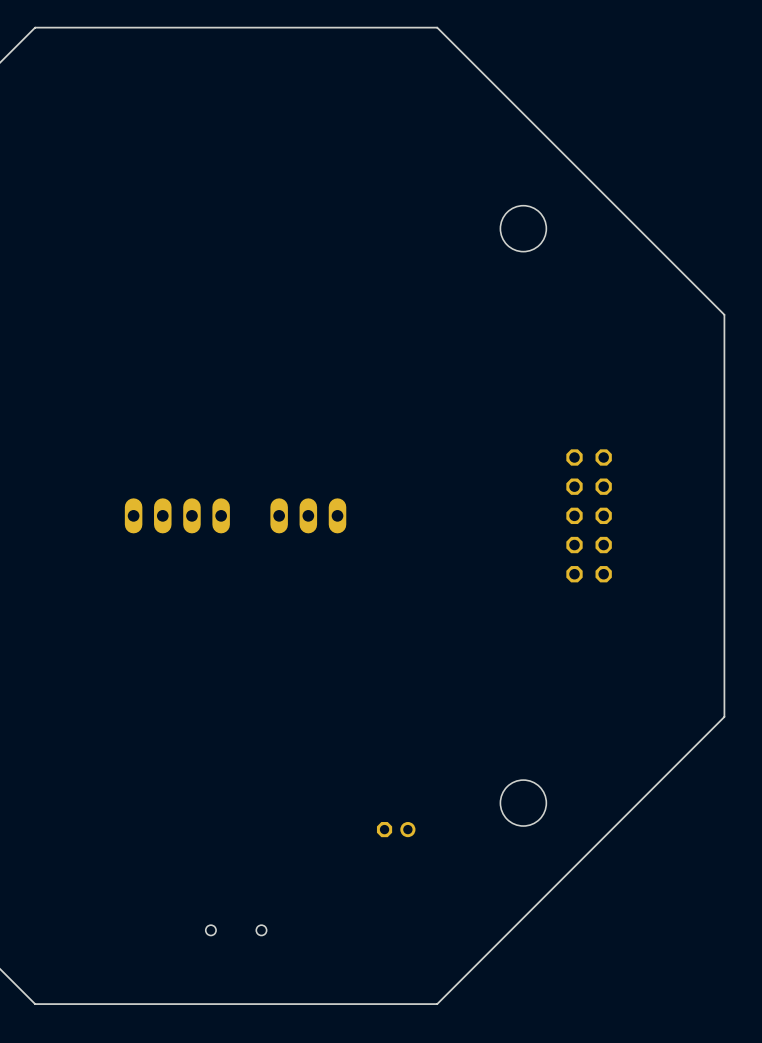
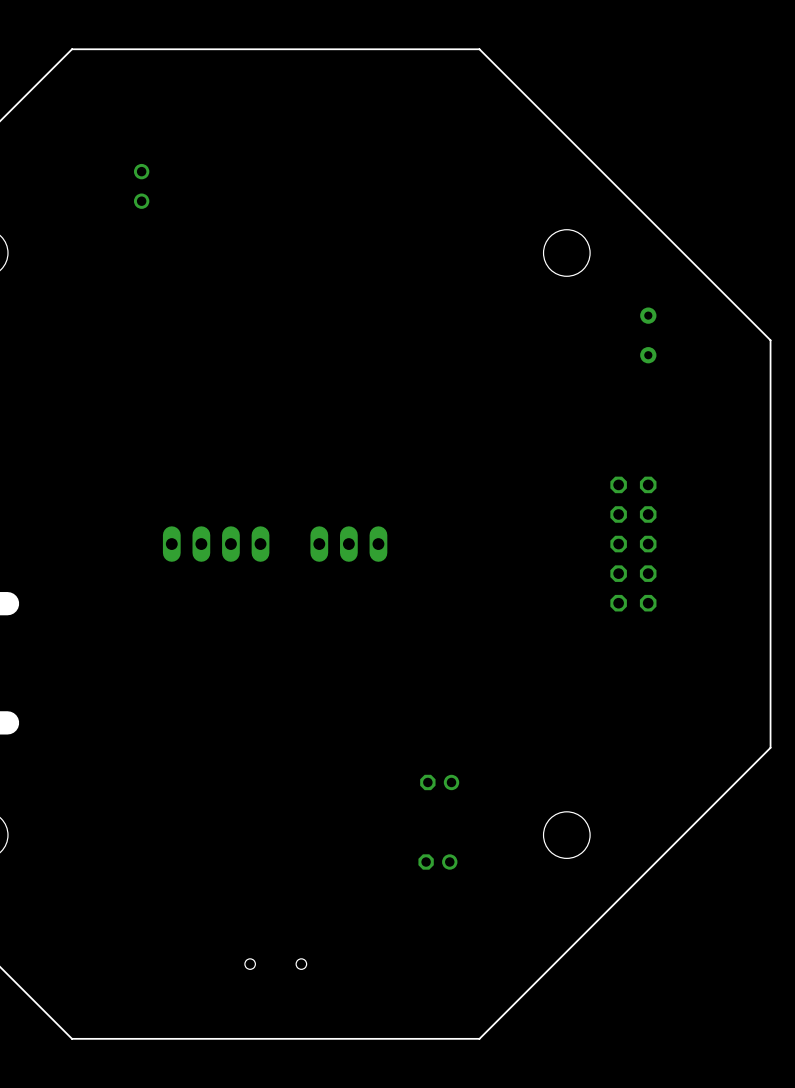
part: none -> (141, 186)
part: none -> (648, 335)
part: none -> (439, 782)

